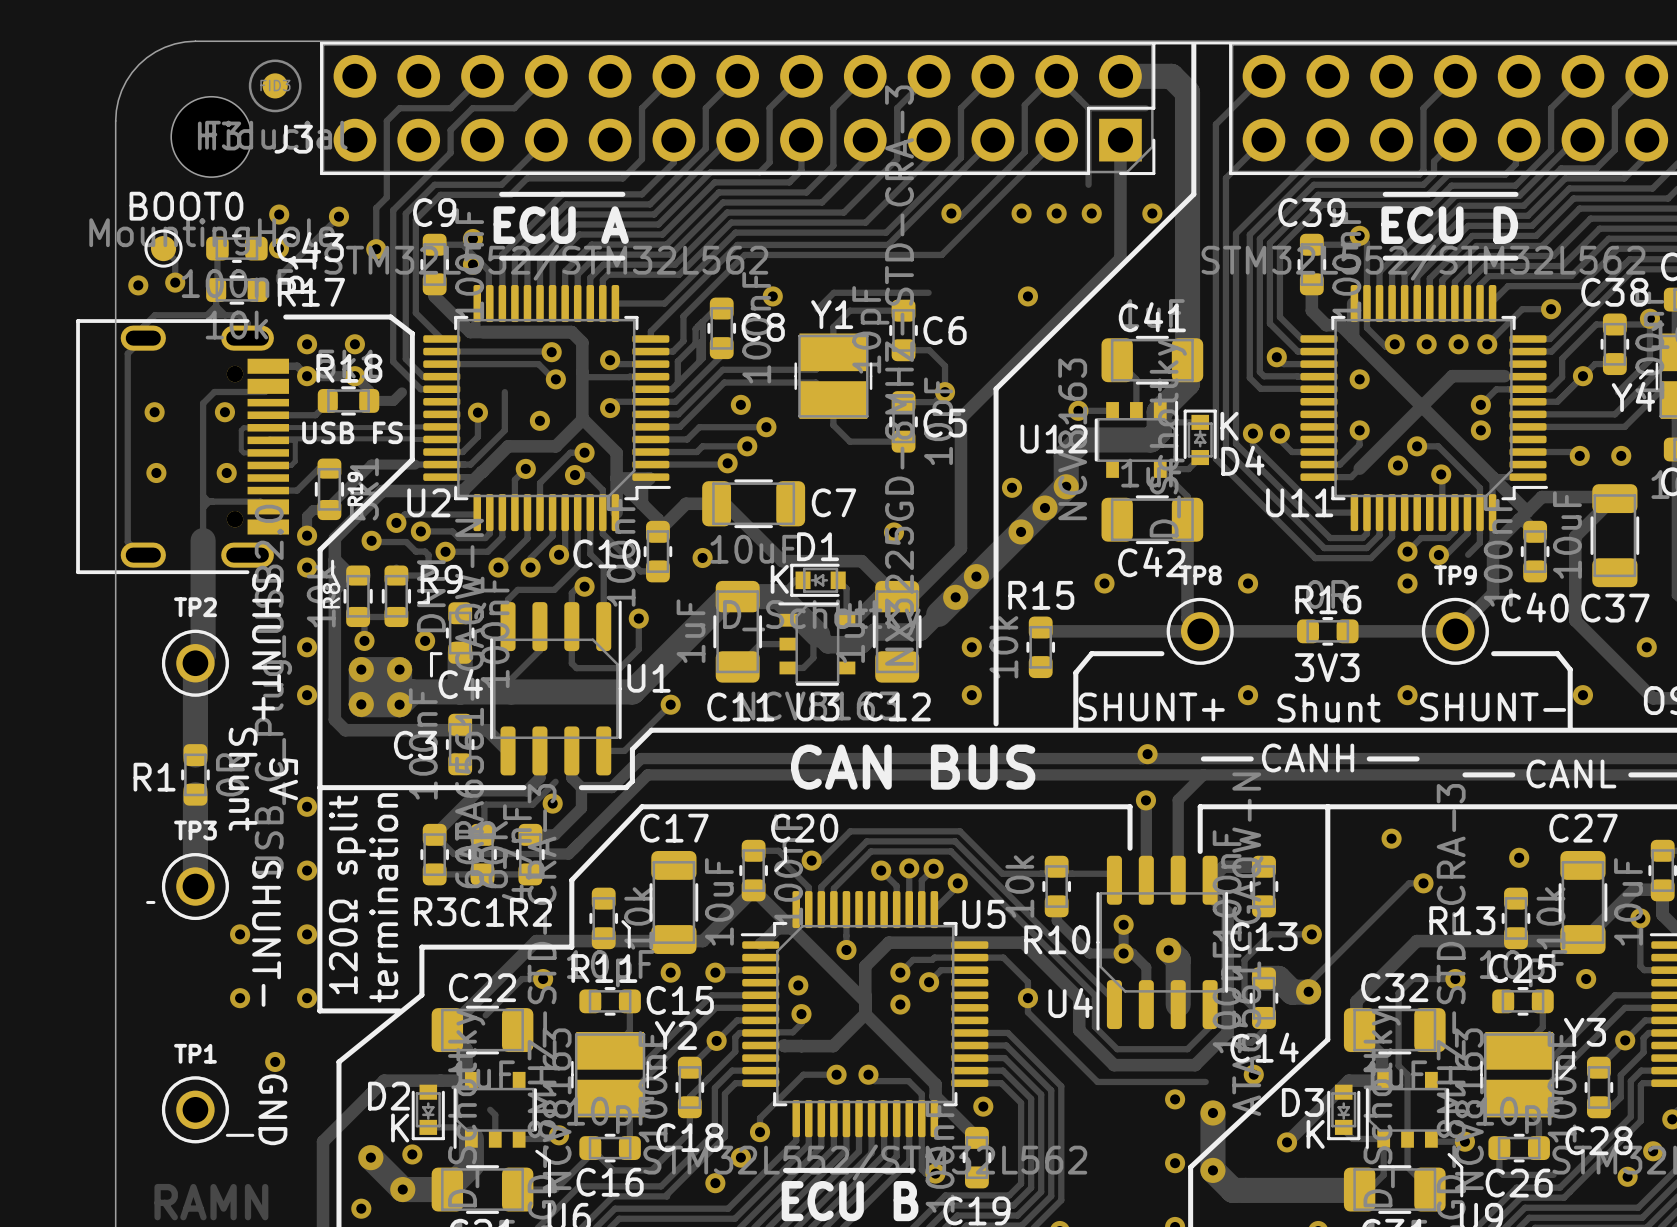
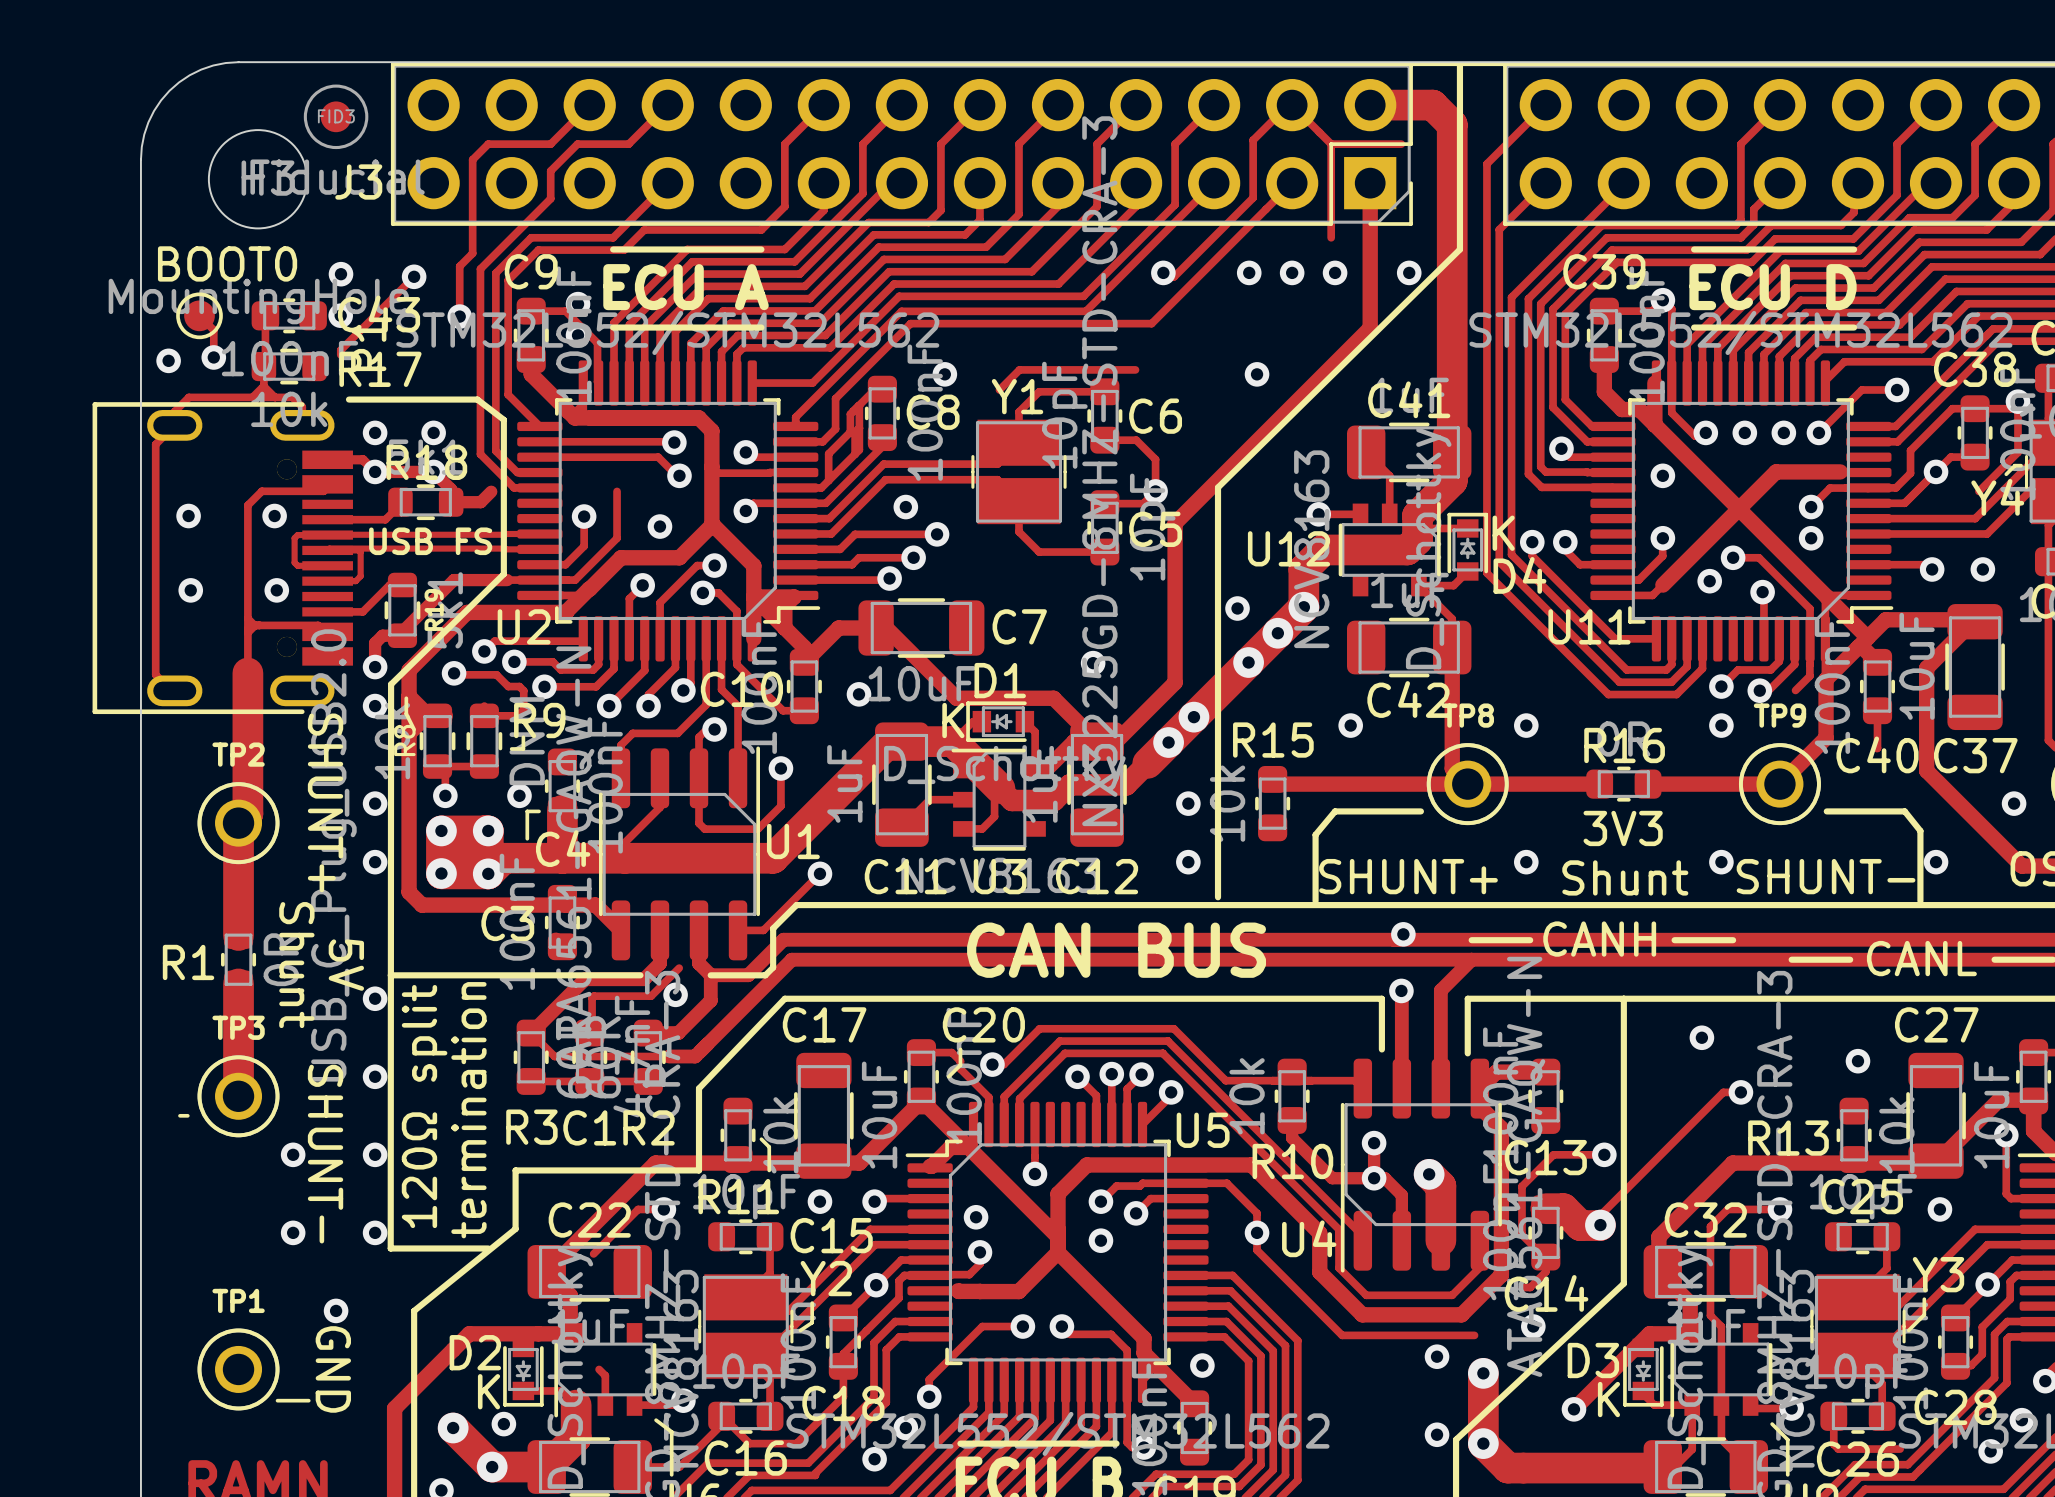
track: none -> (1877, 710) (1877, 748)

